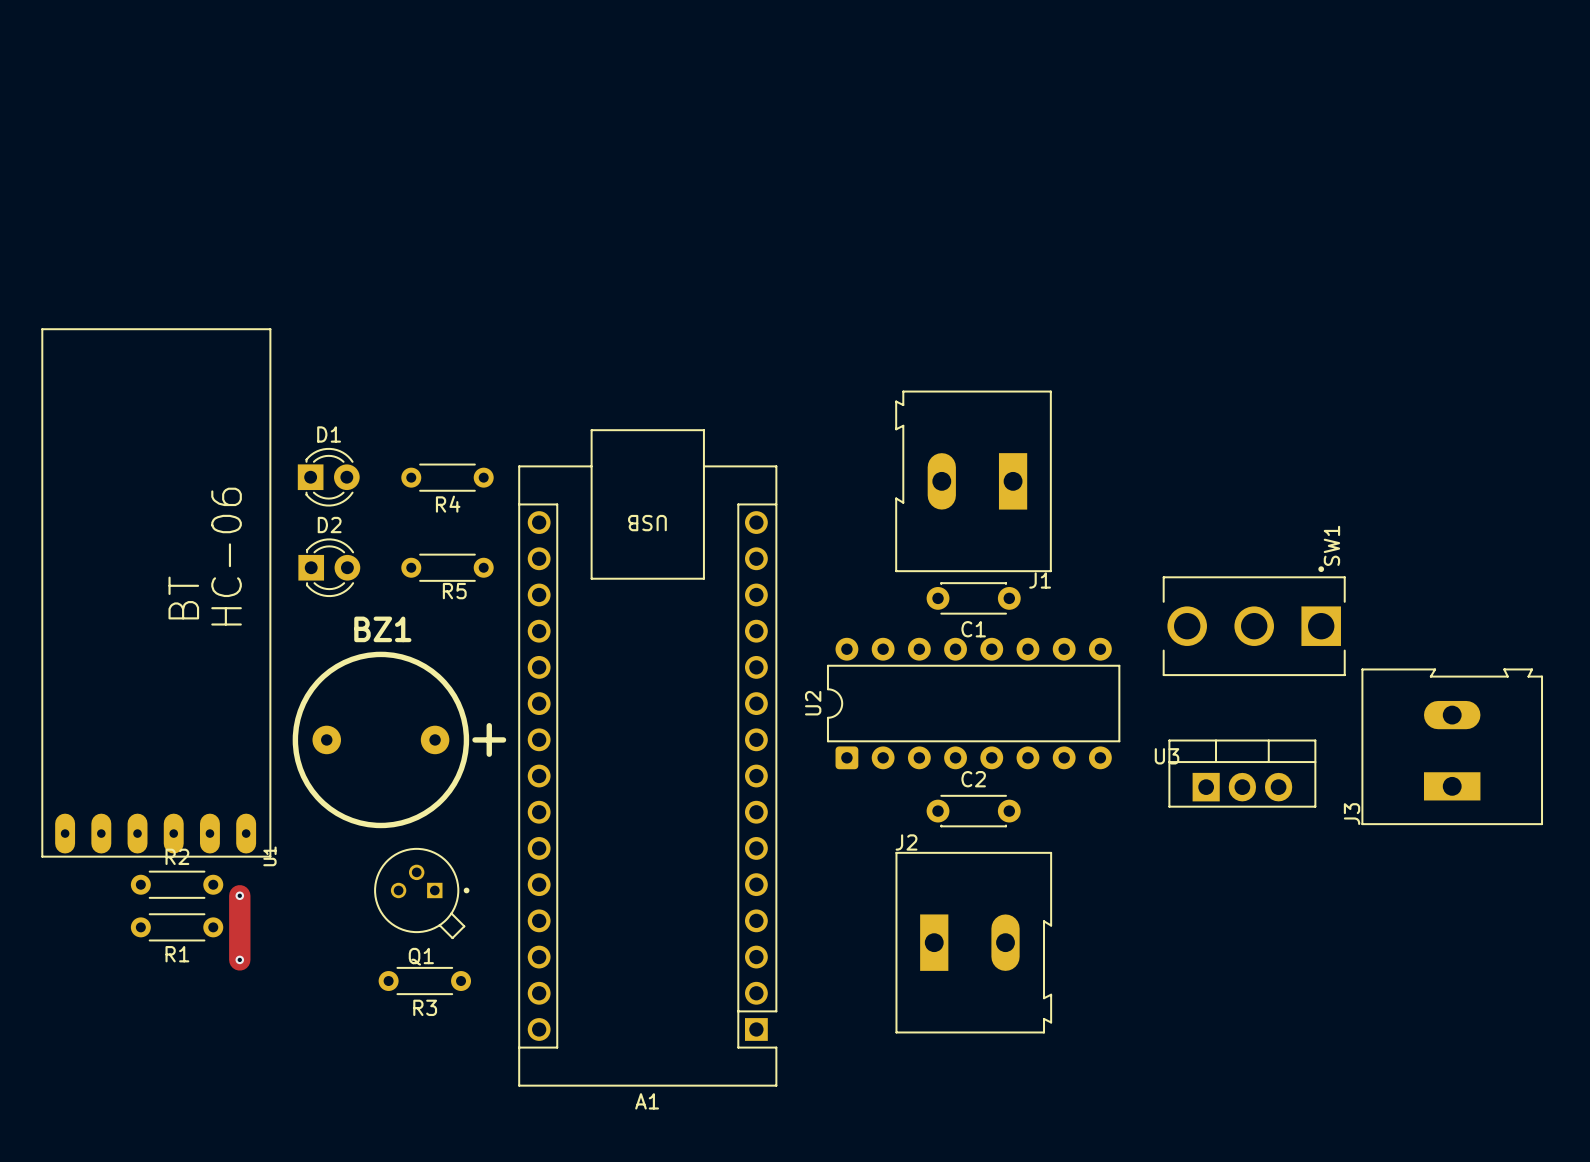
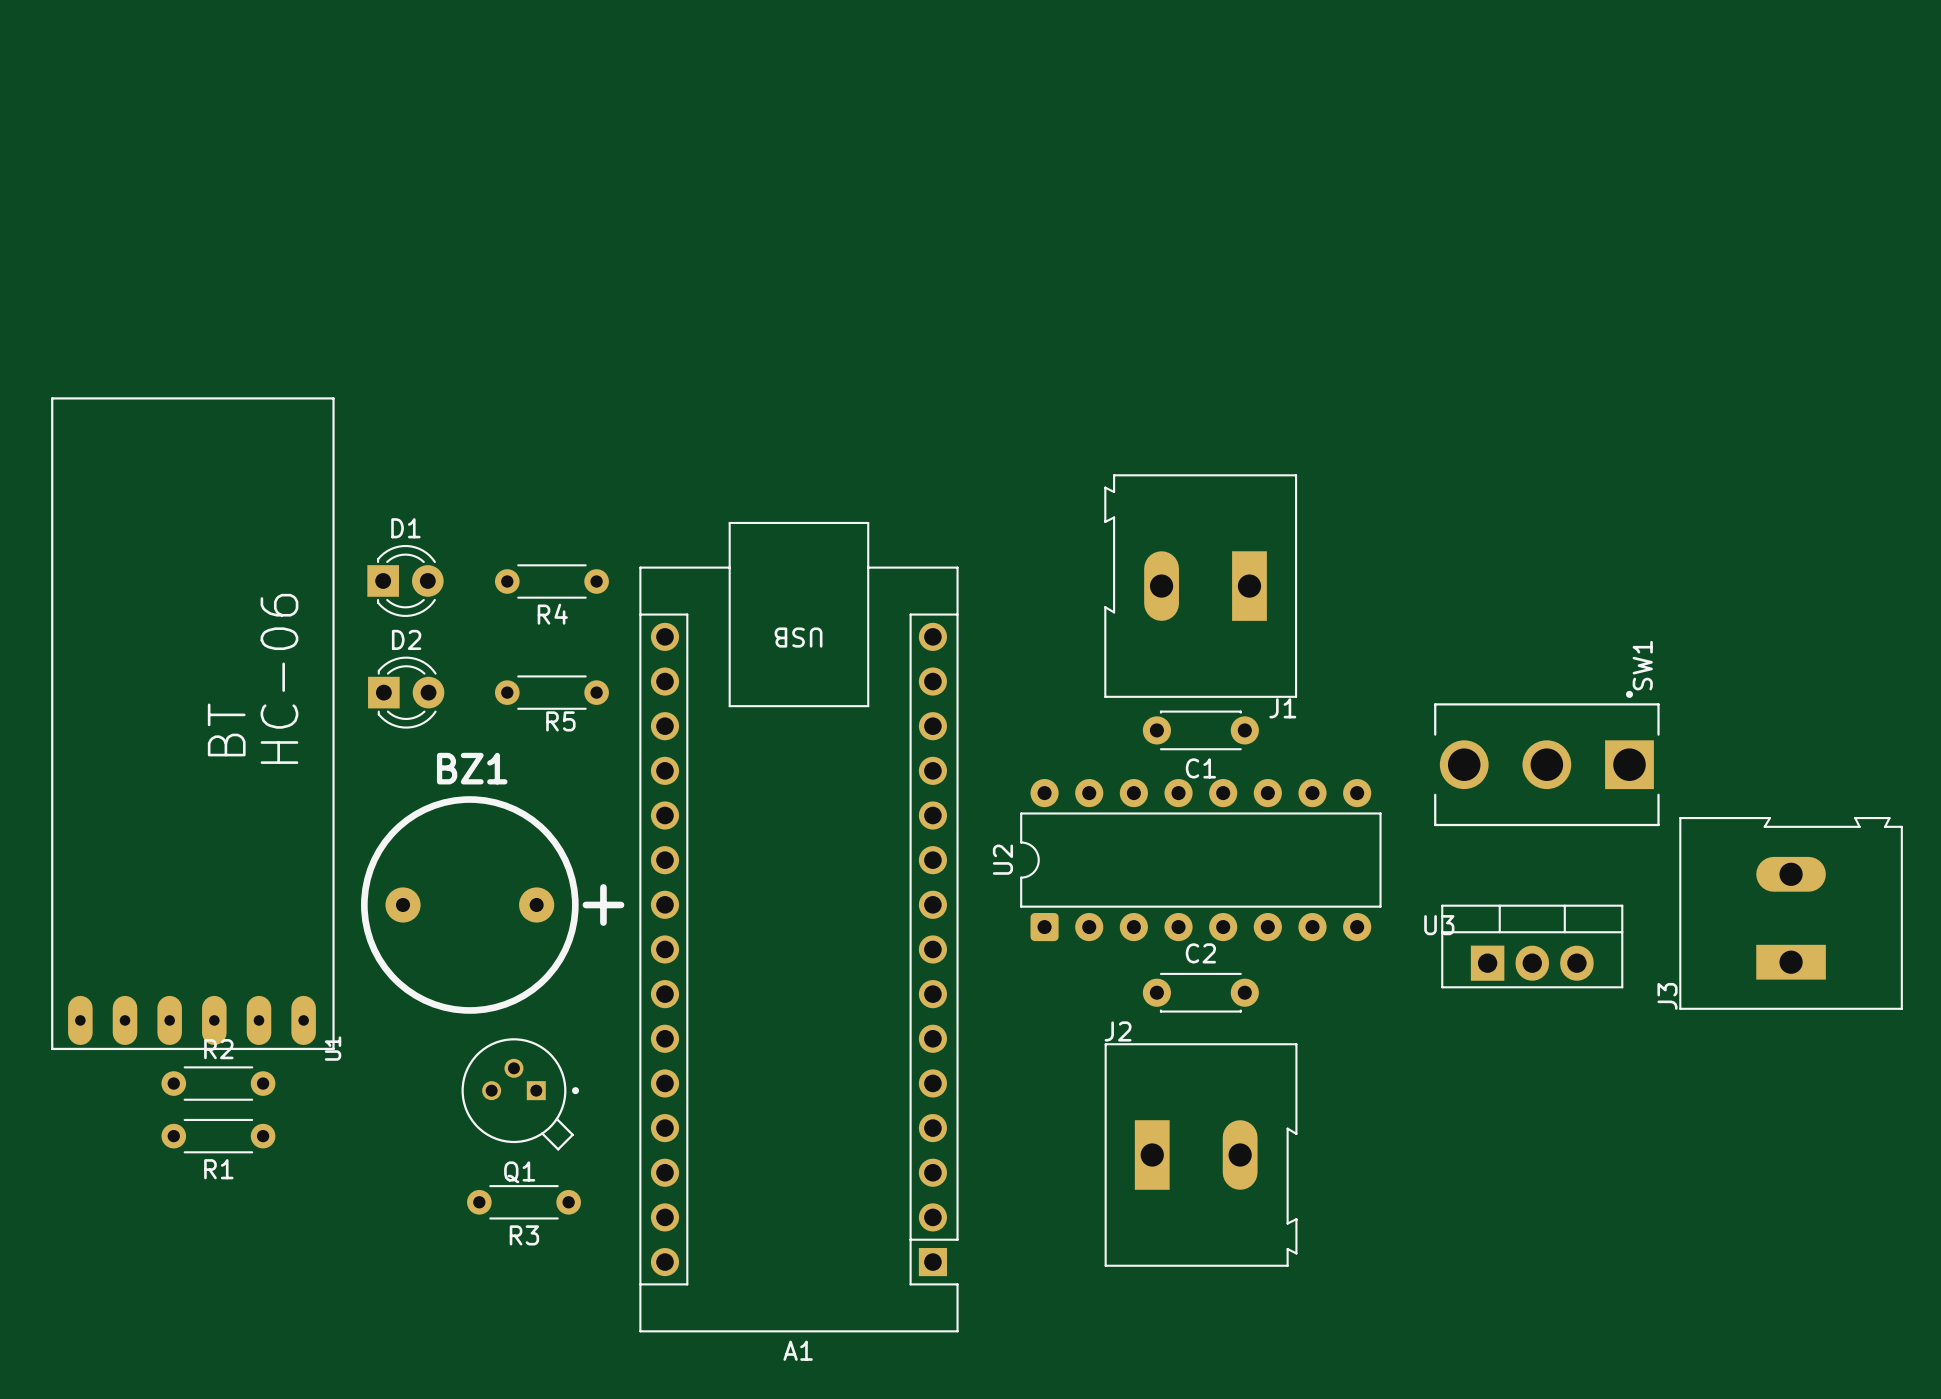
track: (239, 895) (239, 959) -> none
via: (239, 895) -> none
via: (239, 959) -> none

